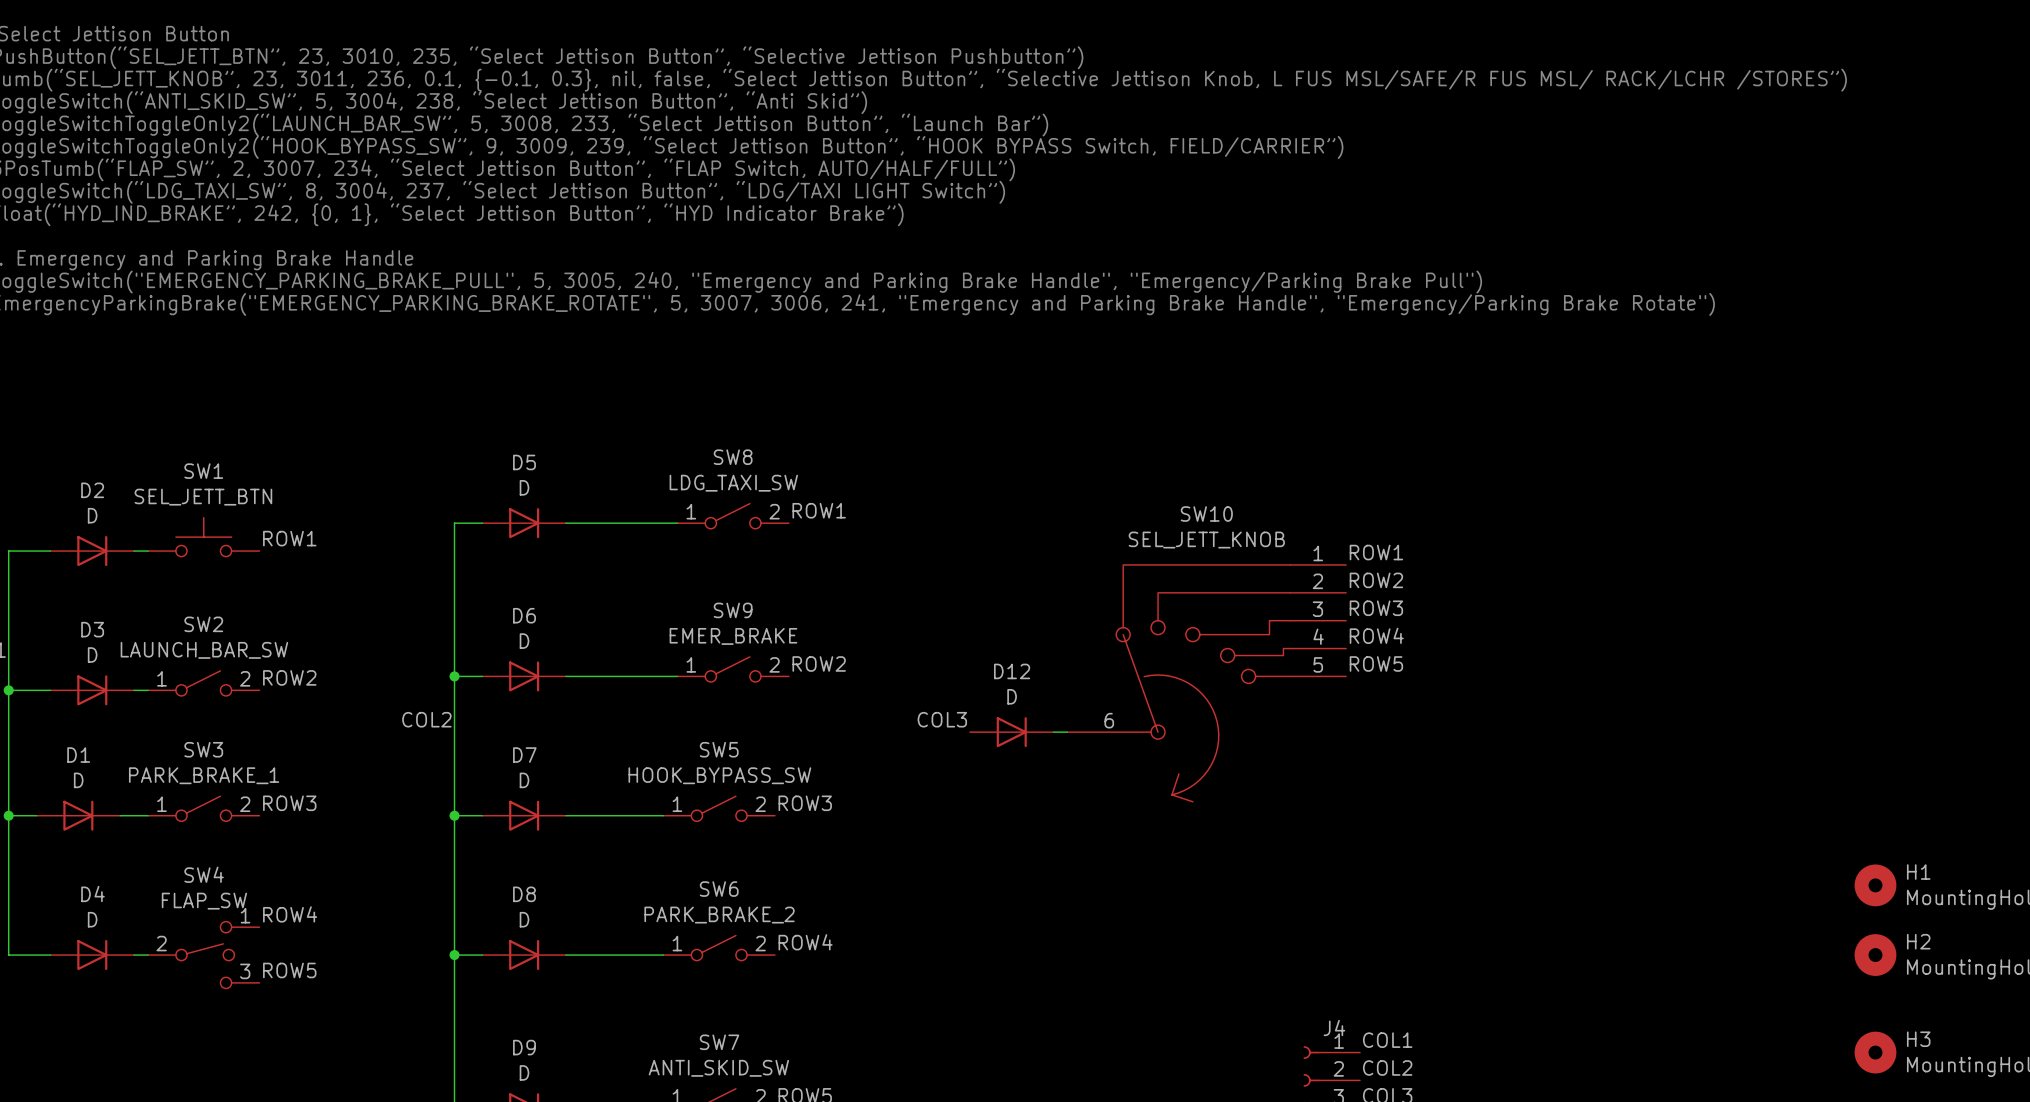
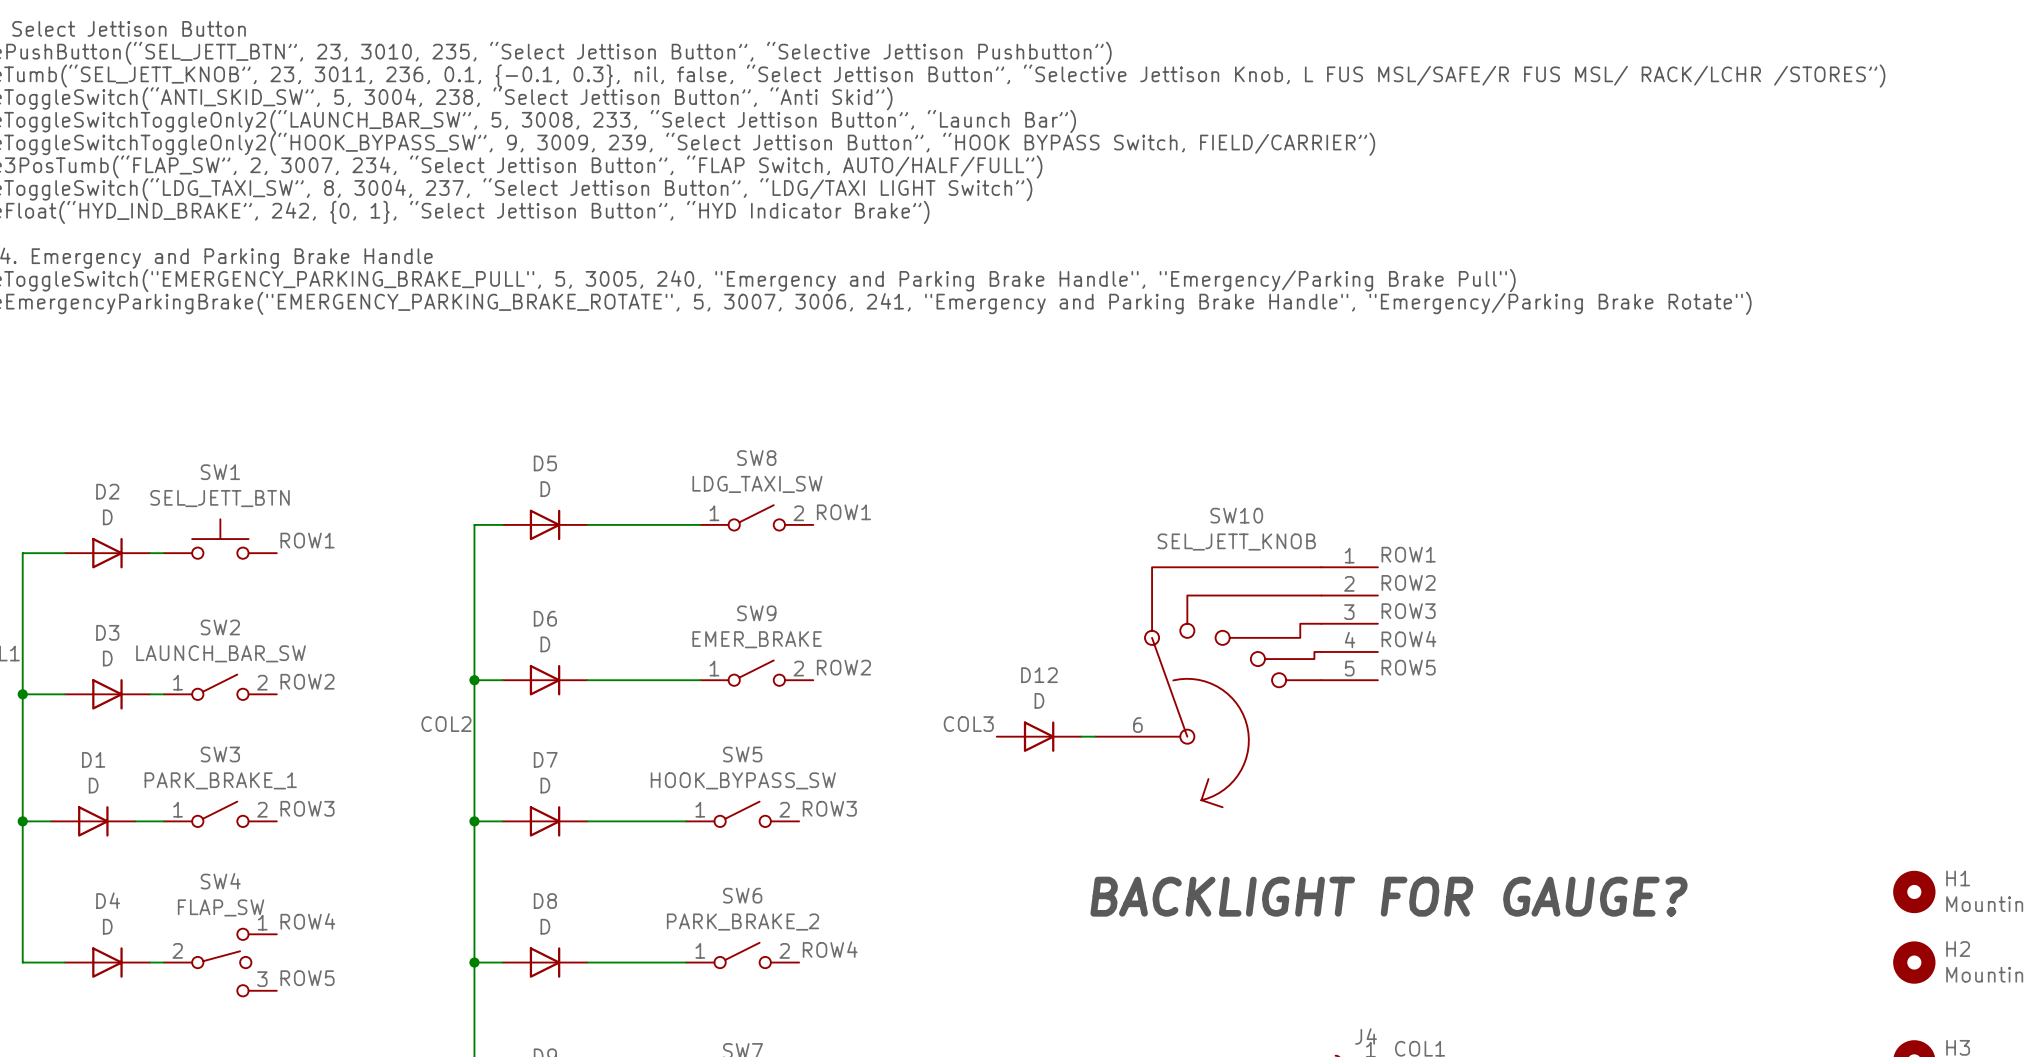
text: none -> BACKLIGHT FOR GAUGE? (1389, 896)

